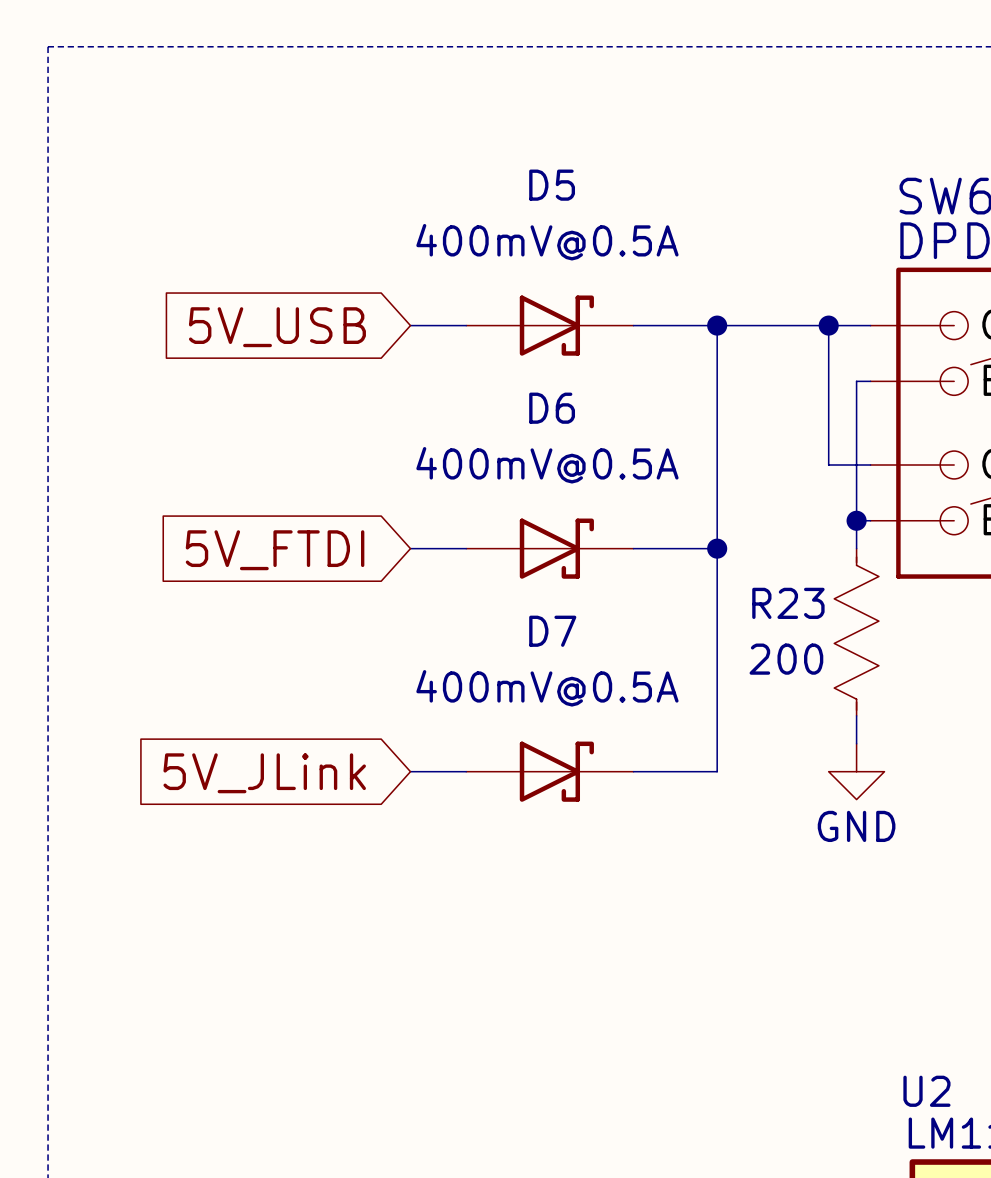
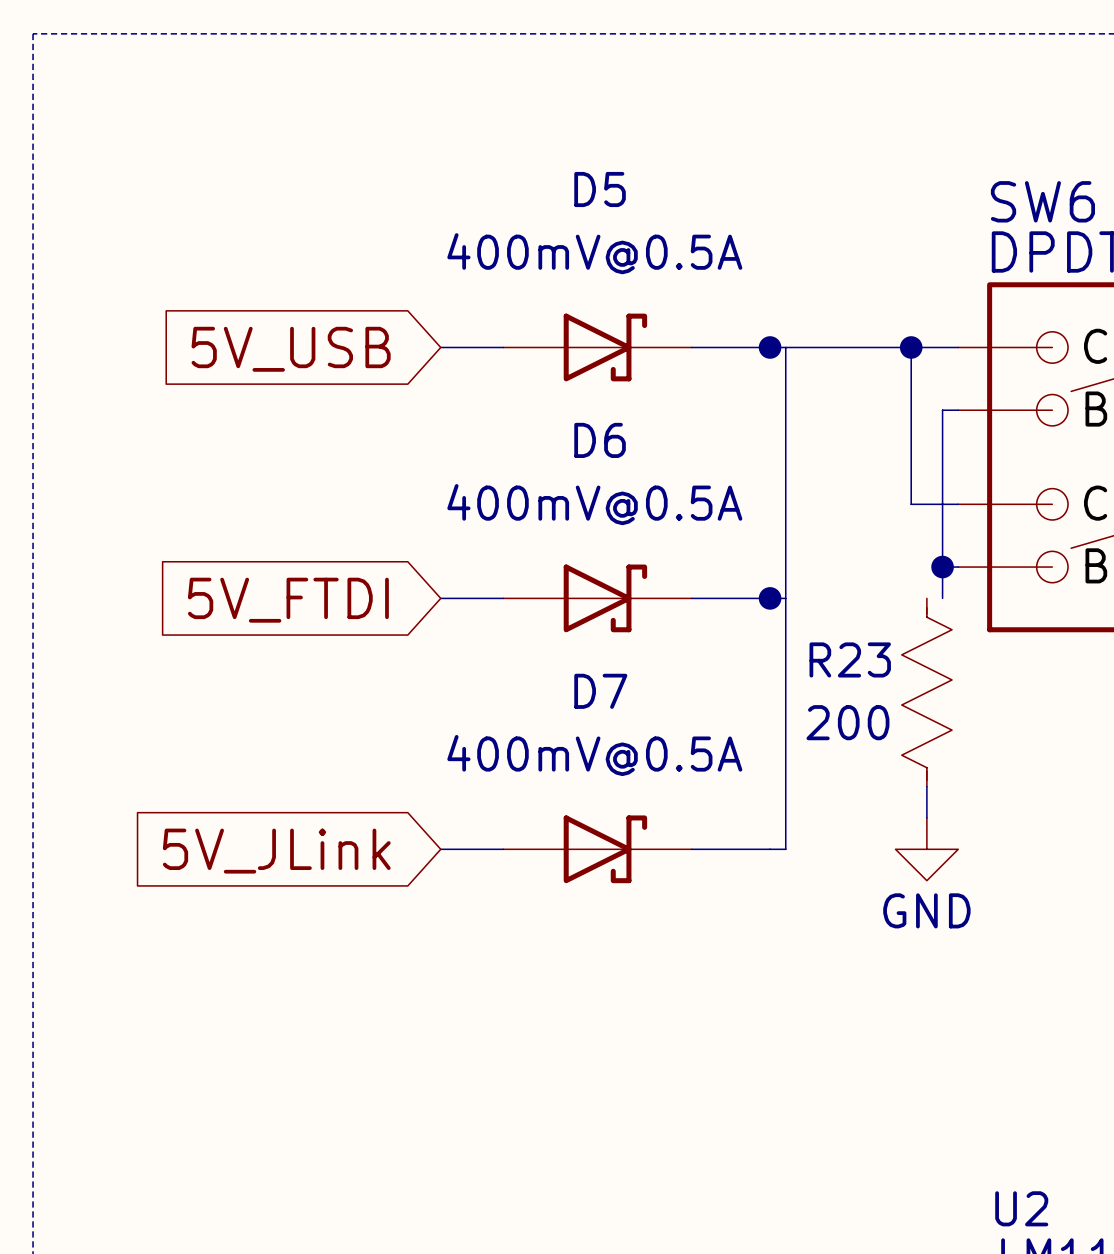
junction position: (717, 325) -> (770, 347)
junction position: (717, 548) -> (770, 598)
R23 position: (856, 632) -> (926, 692)
wire: (856, 715) (856, 743) -> (926, 786) (926, 817)
power symbol position: GND (856, 771) -> GND (926, 849)

